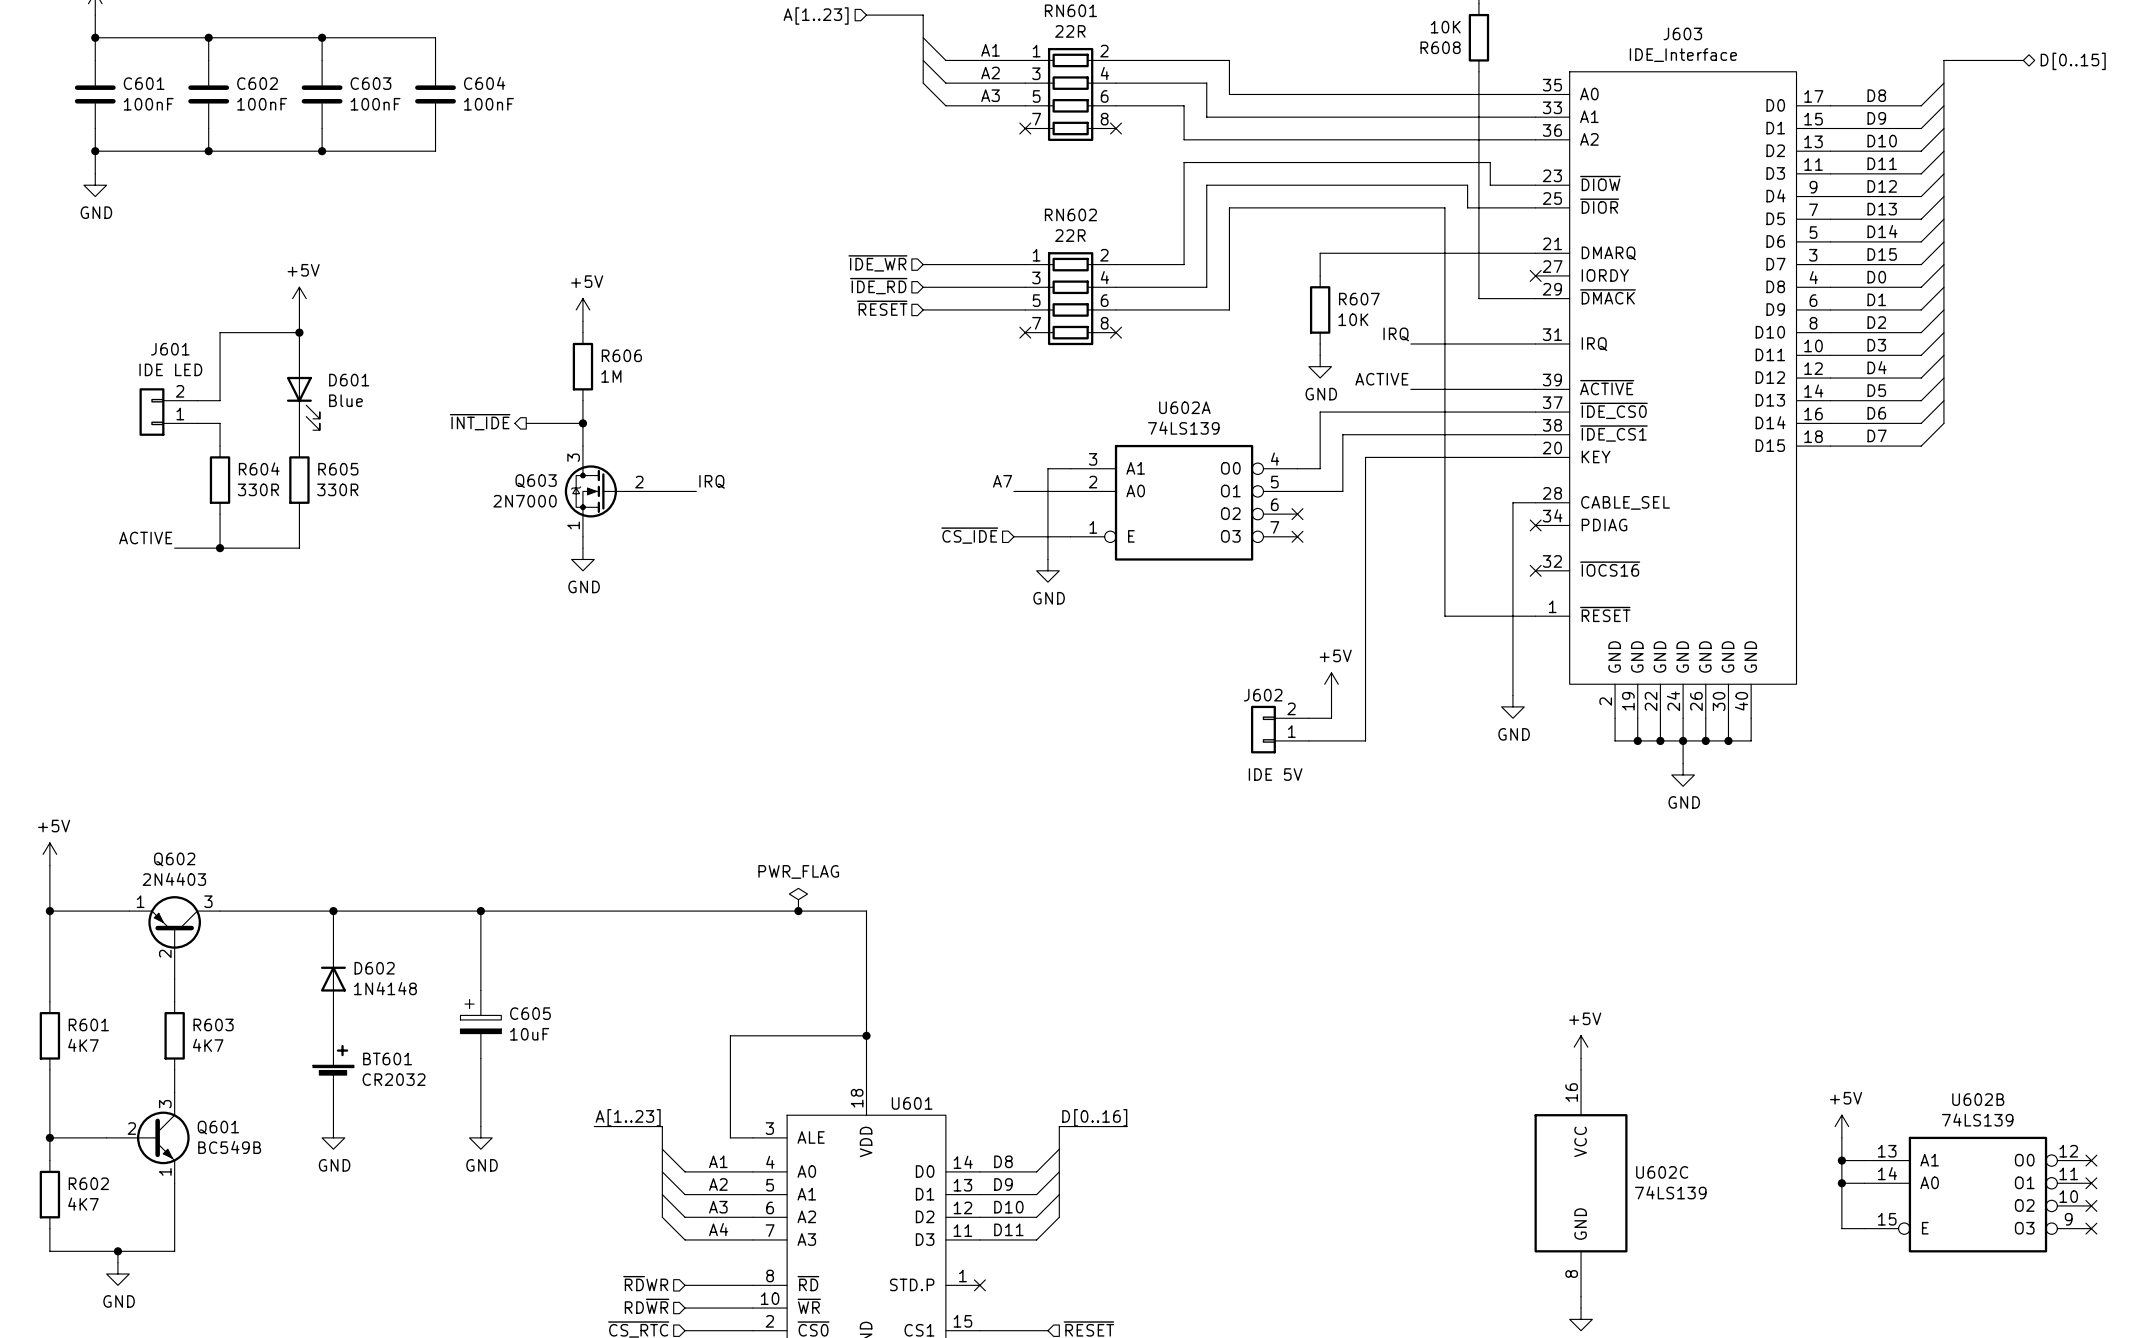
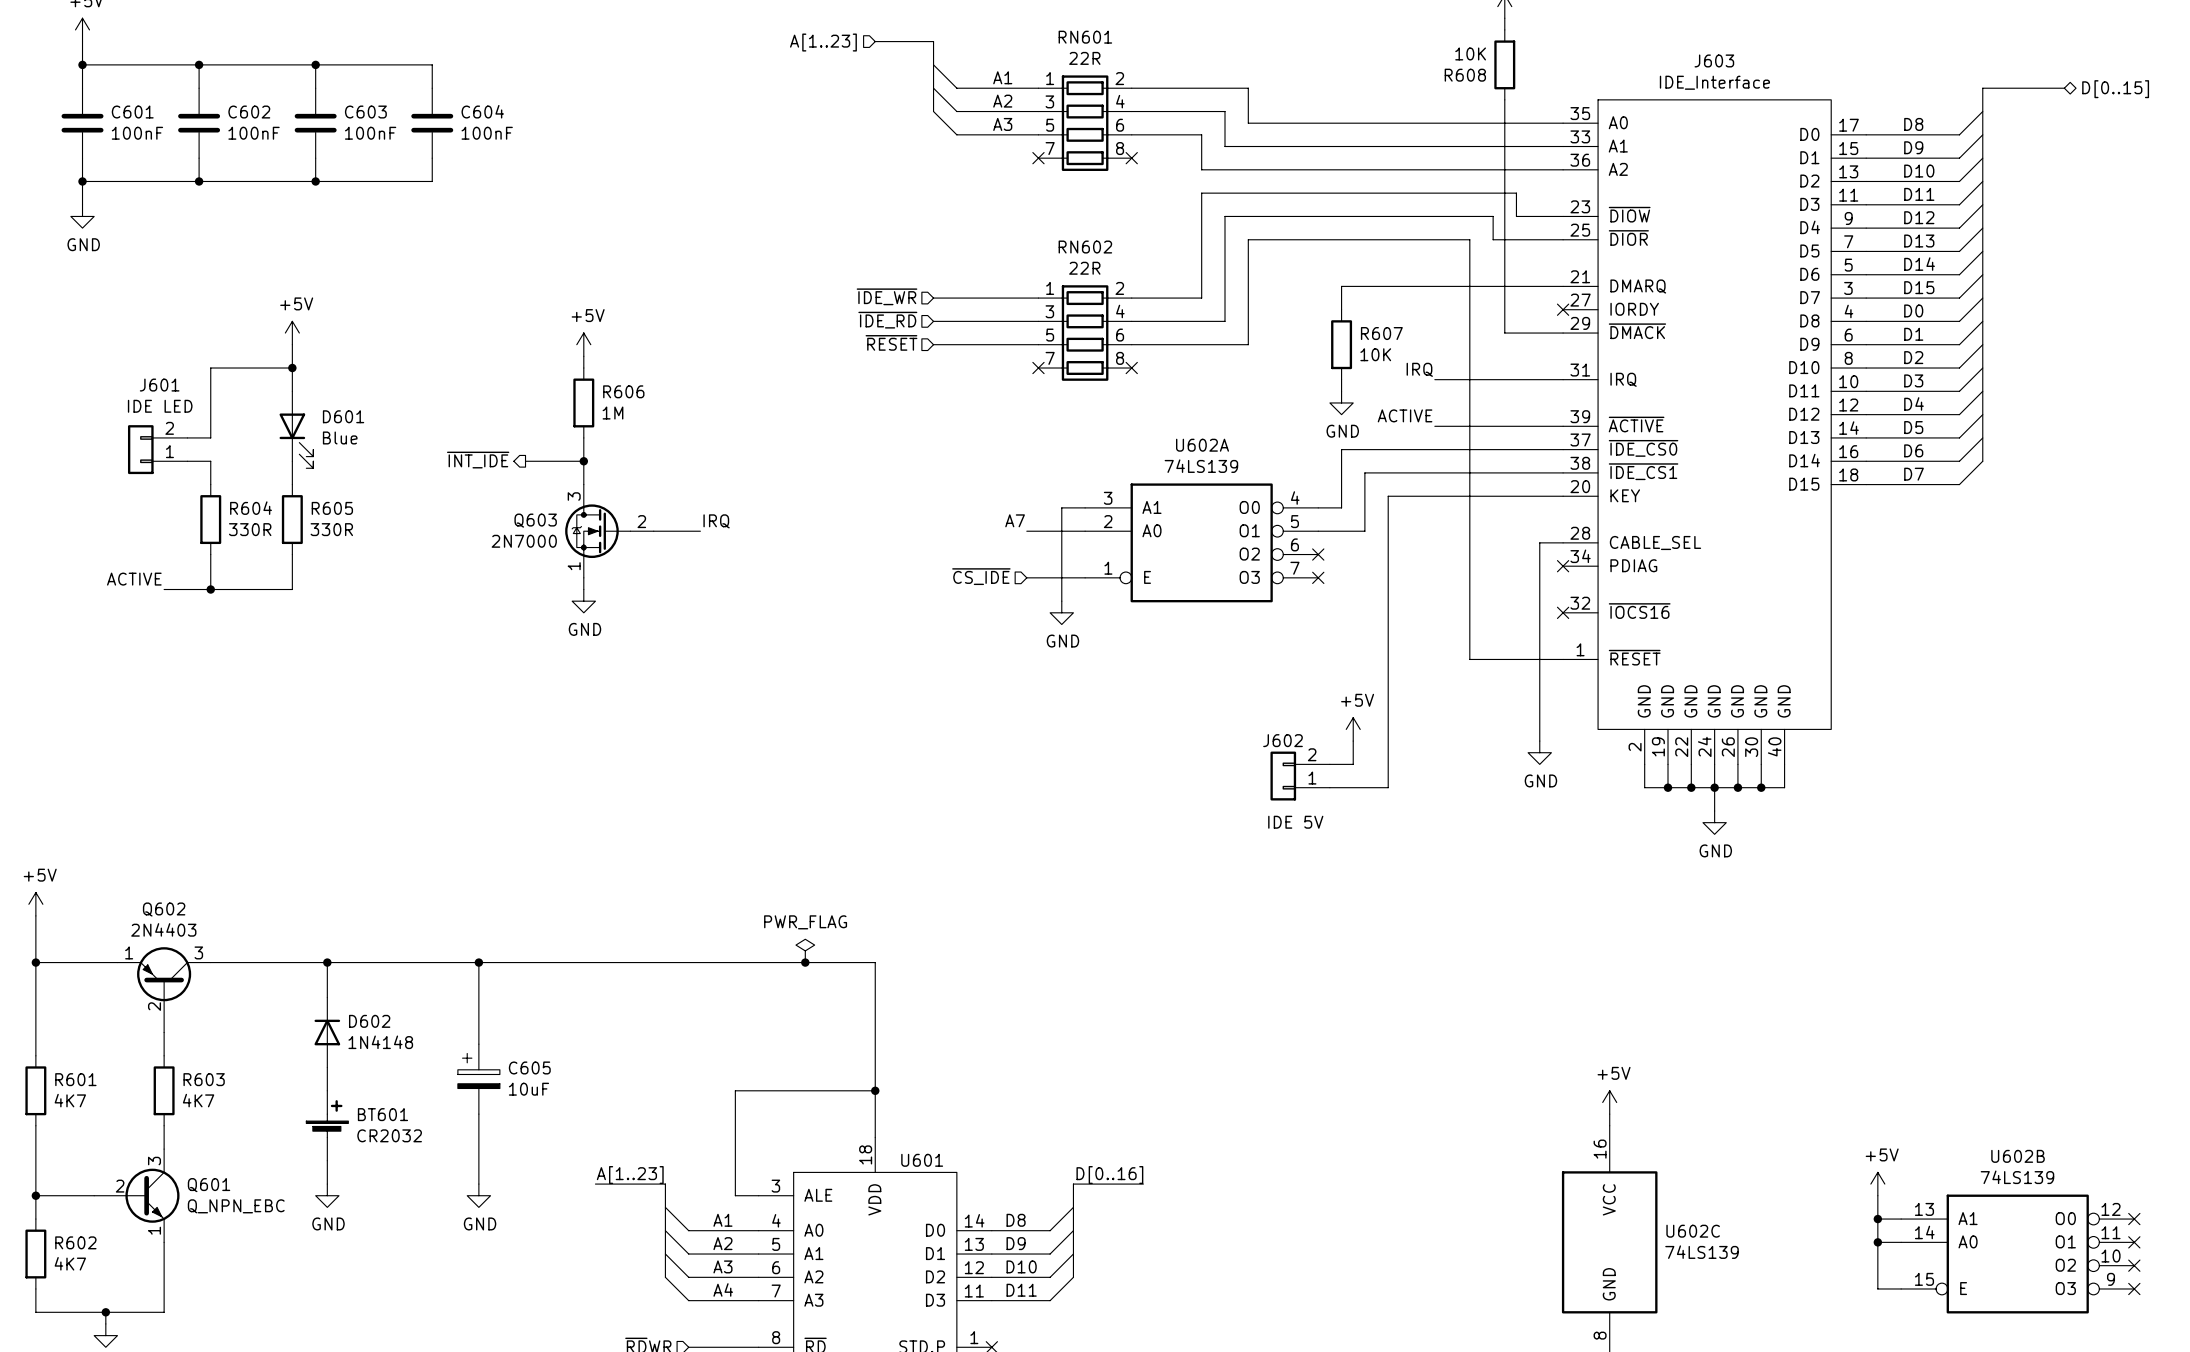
Q601 value: BC549B (229, 1147) -> Q_NPN_EBC (236, 1206)

